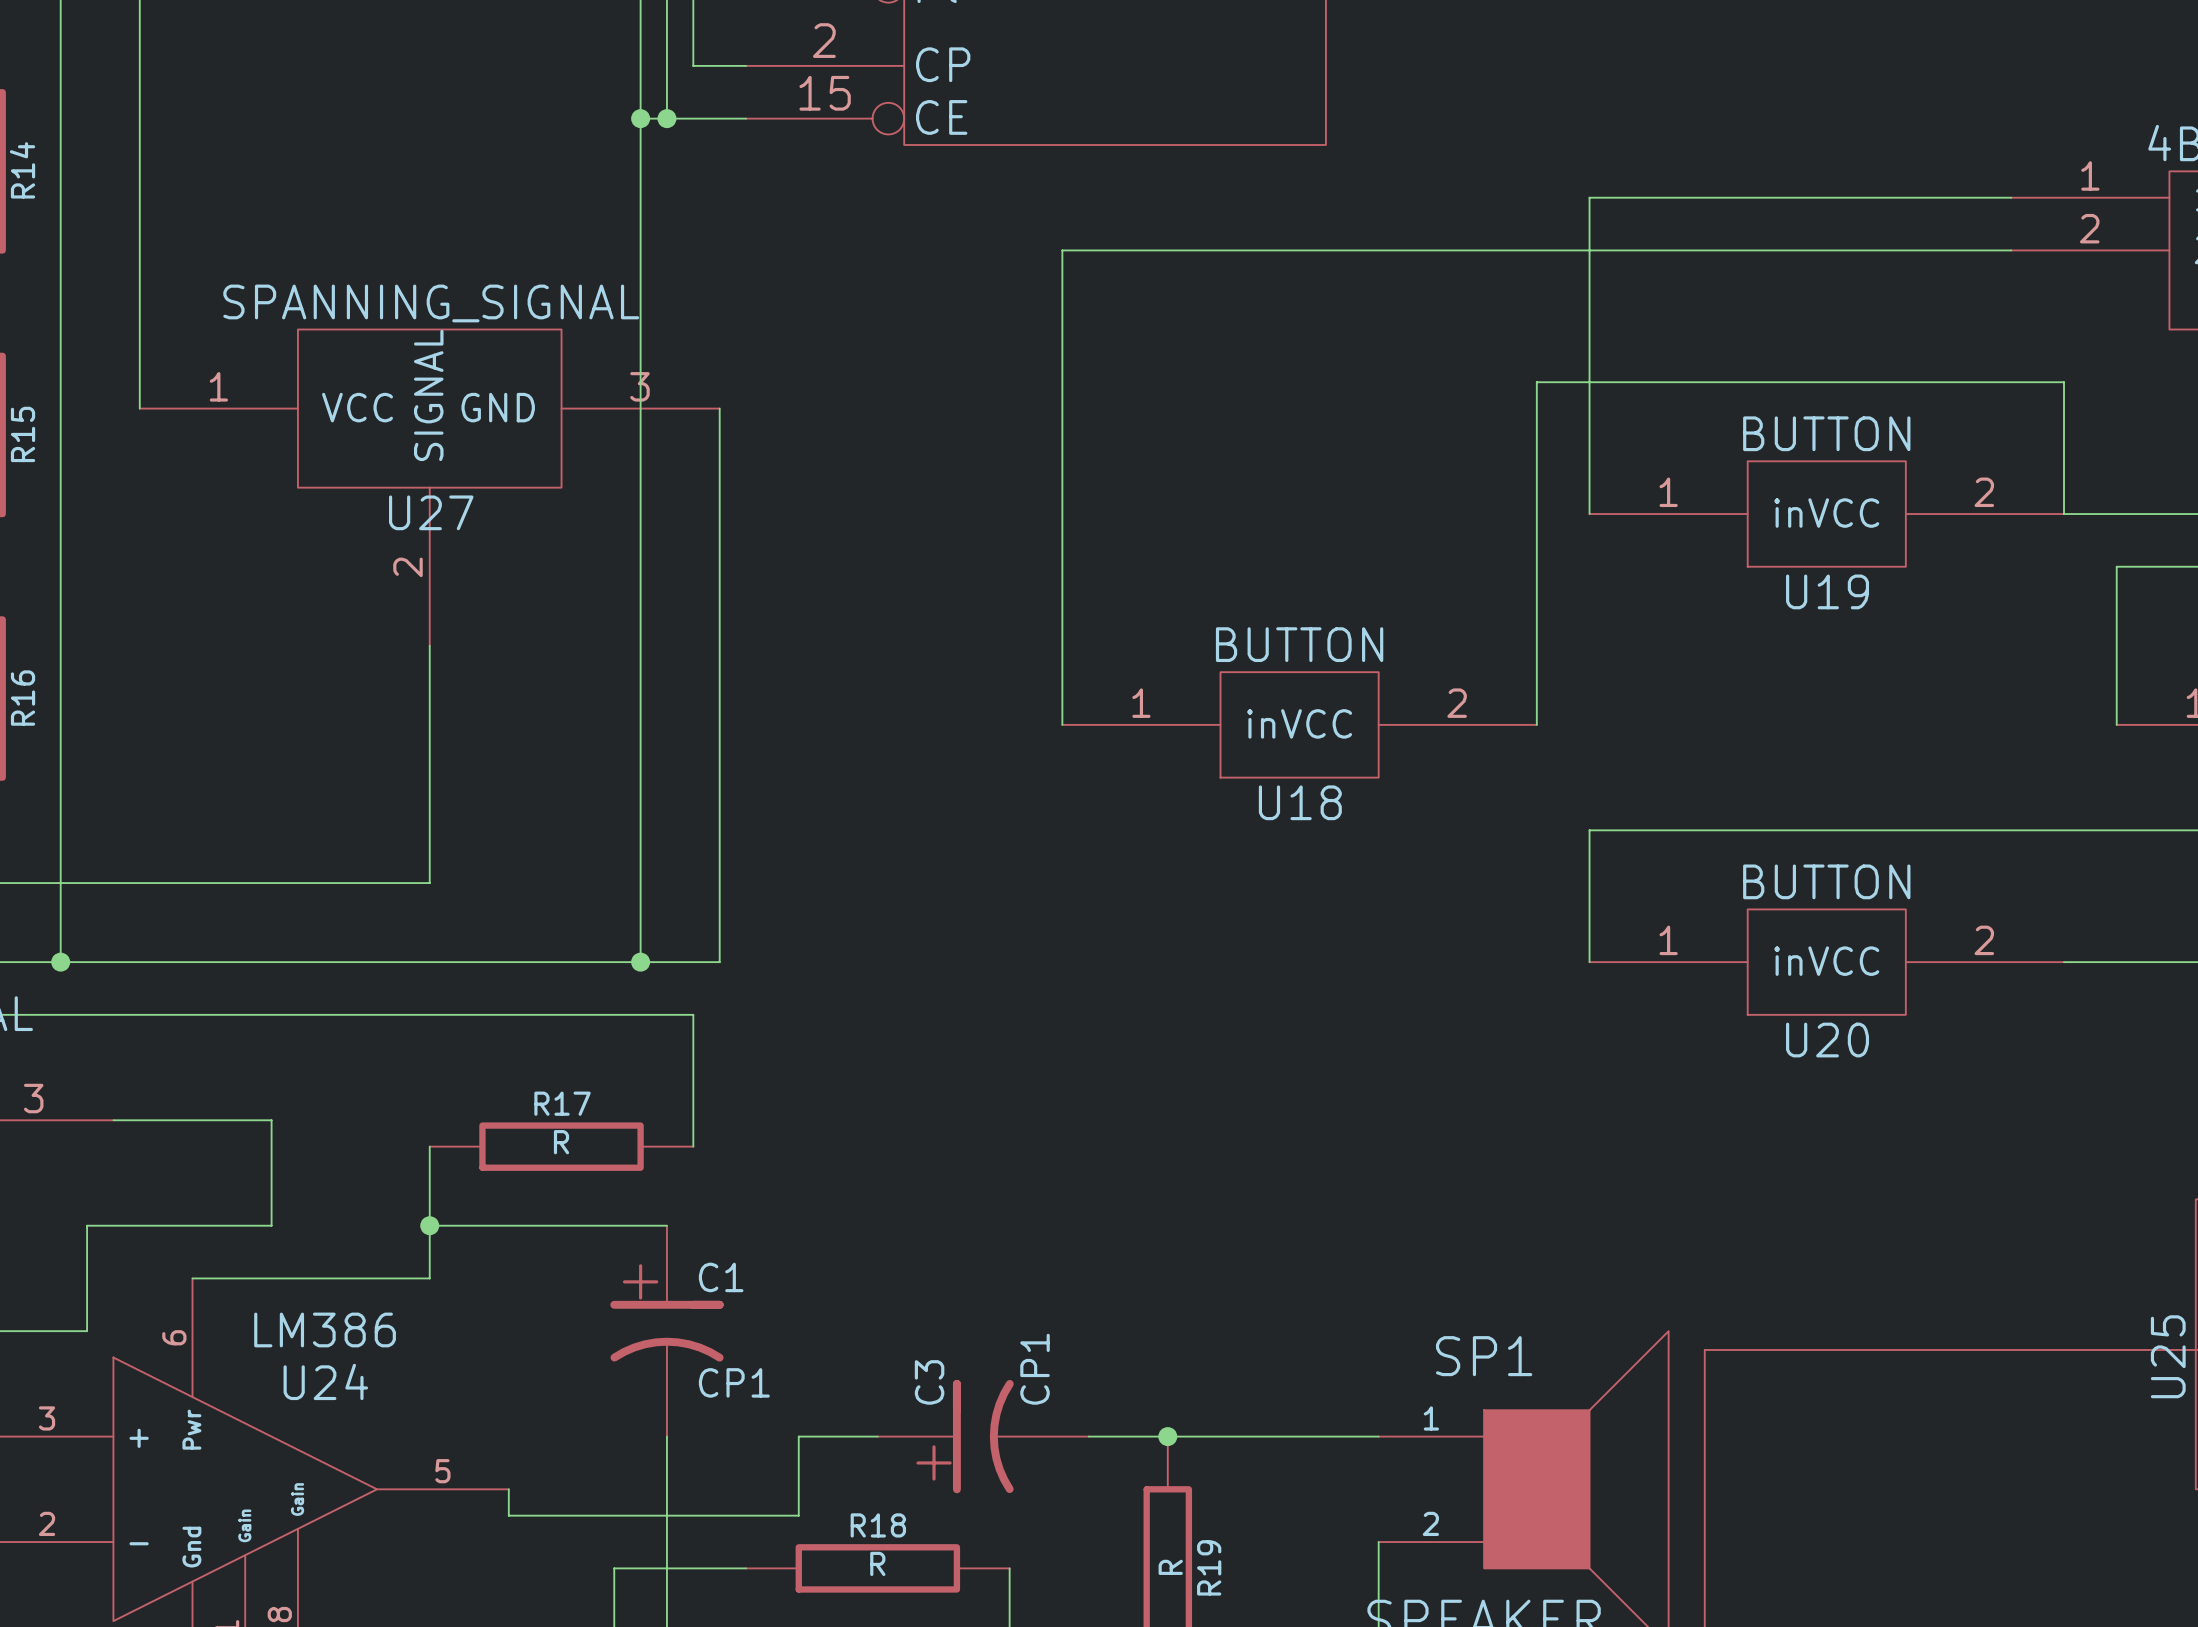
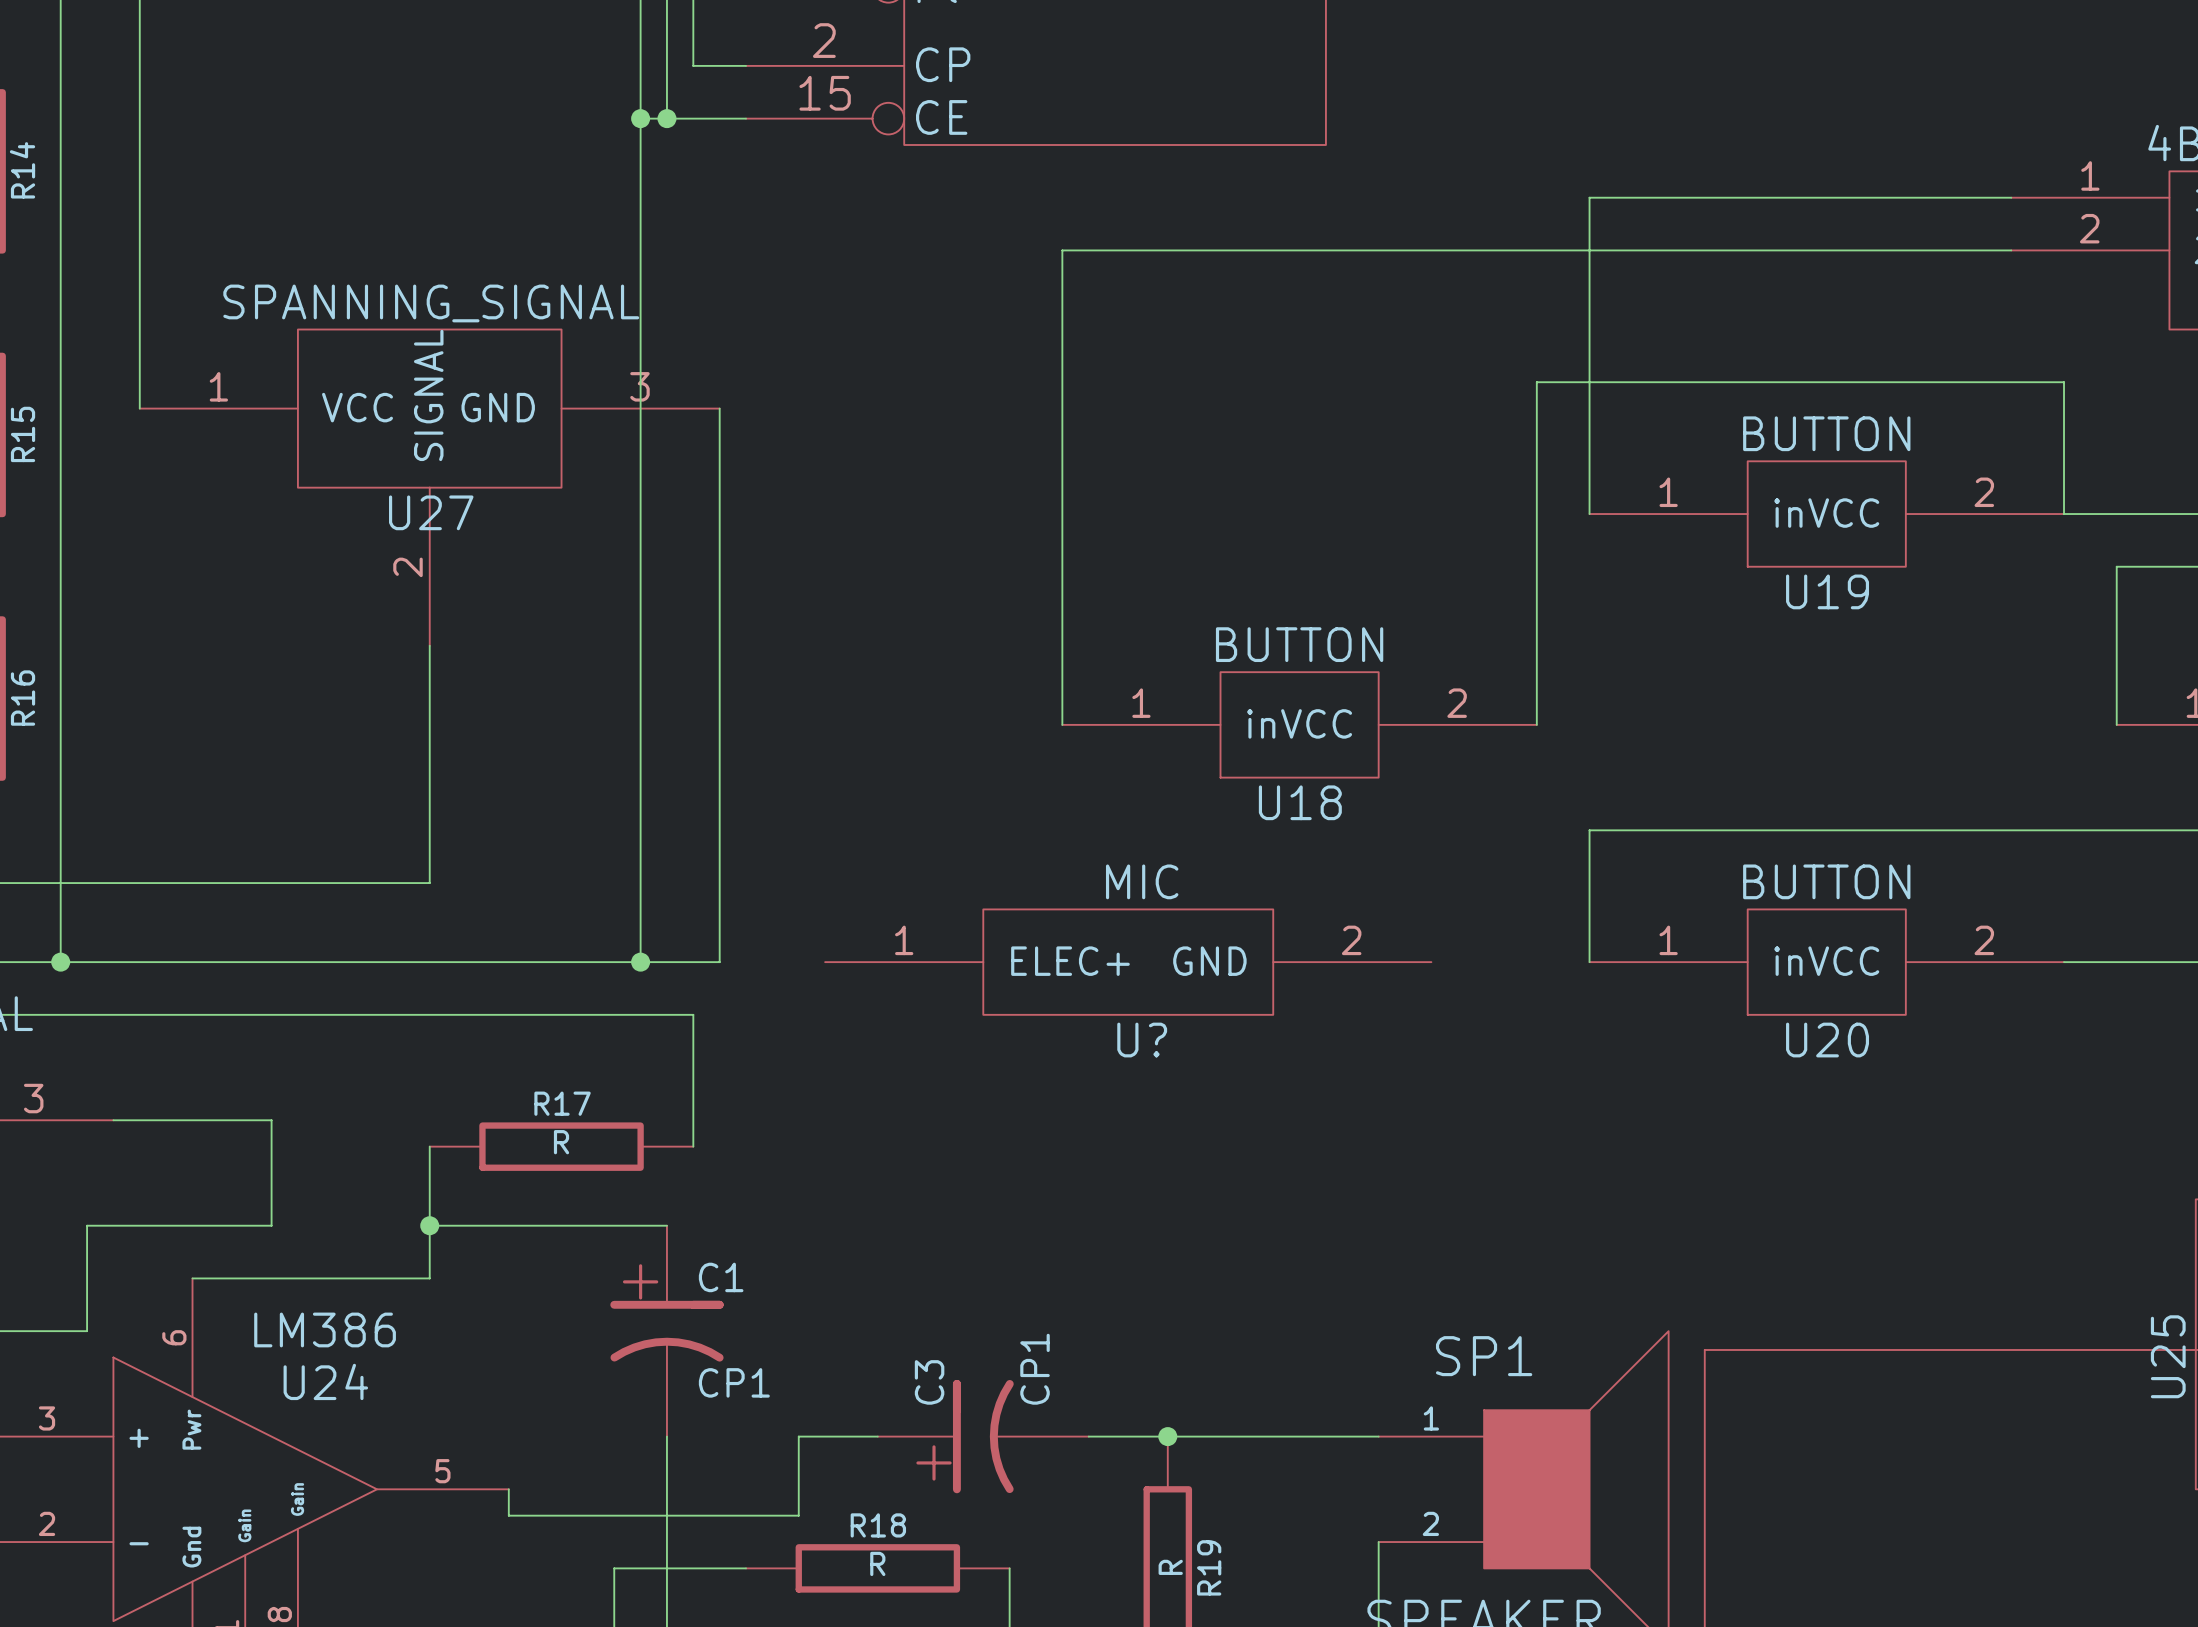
U?: none -> MIC (1128, 962)

